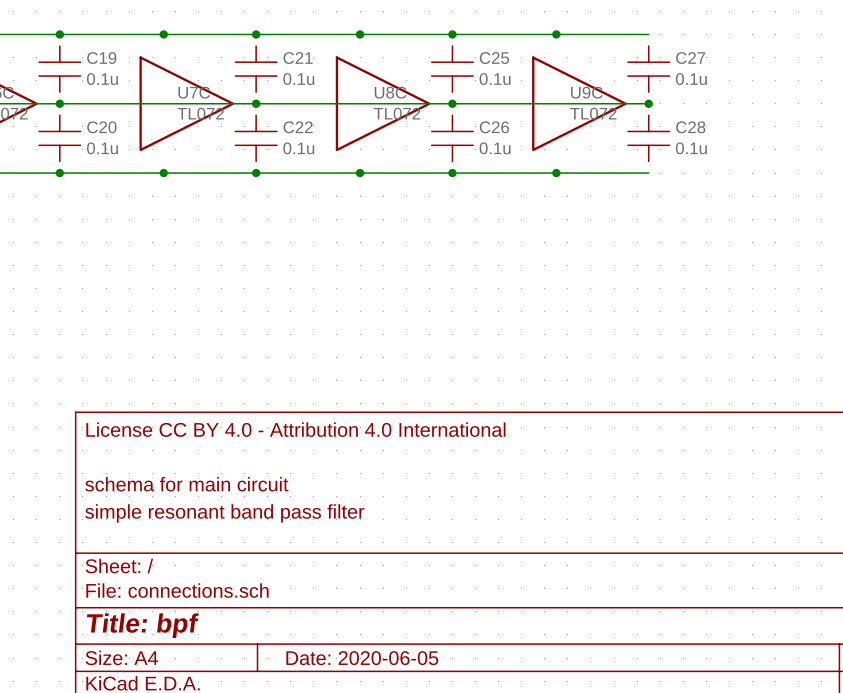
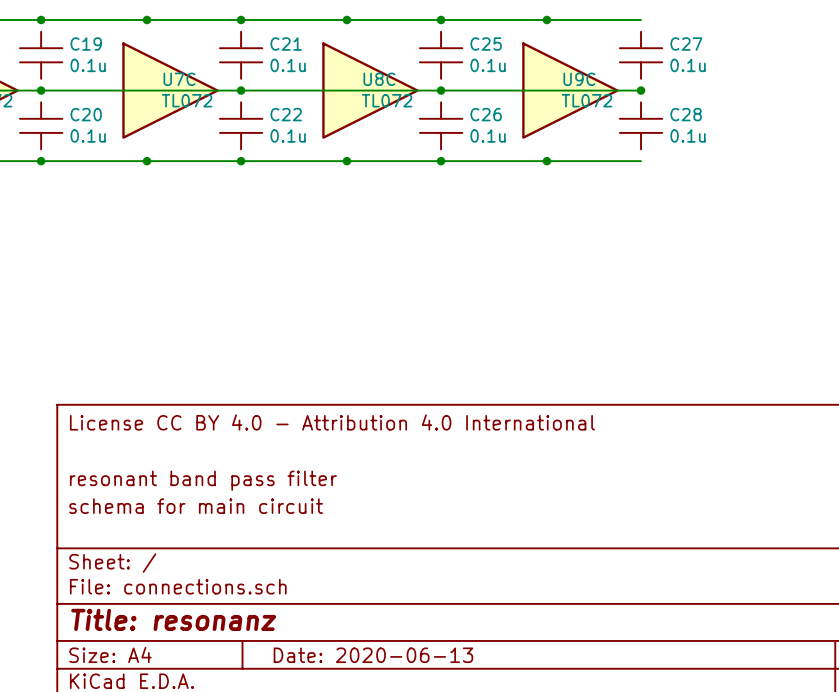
title block: schema for main circuit (186, 484) -> resonant band pass filter (203, 480)
title block: simple resonant band pass filter (224, 513) -> schema for main circuit (196, 506)
title block: Title: bpf (142, 625) -> Title: resonanz (173, 619)
title block: Date: 2020-06-05 (362, 658) -> Date: 2020-06-13 (373, 655)

